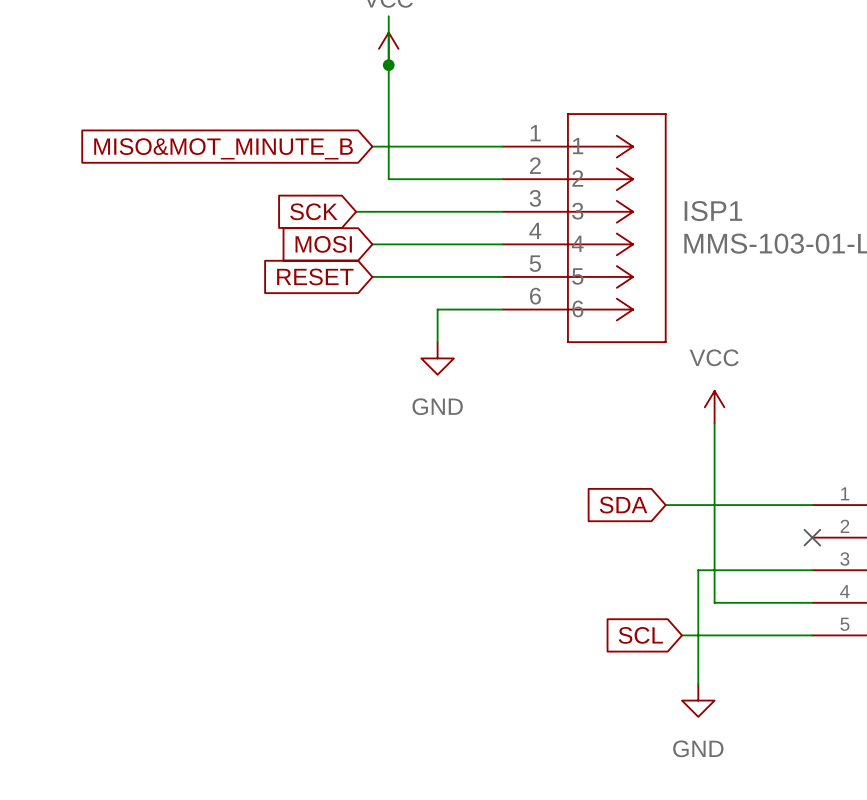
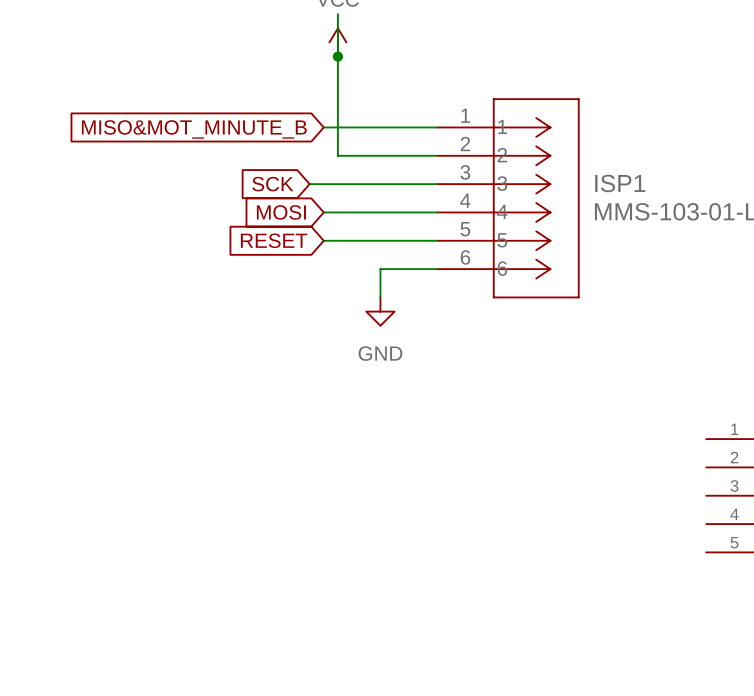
power symbol: VCC (714, 407) -> none
wire: (714, 423) (714, 602) (812, 602) -> none
global label: SDA (623, 505) -> none
wire: (665, 505) (812, 505) -> none
no-connect mark: (812, 537) -> none
wire: (812, 570) (698, 570) (698, 684) -> none
global label: SCL (640, 635) -> none
wire: (682, 635) (812, 635) -> none
power symbol: GND (698, 700) -> none

